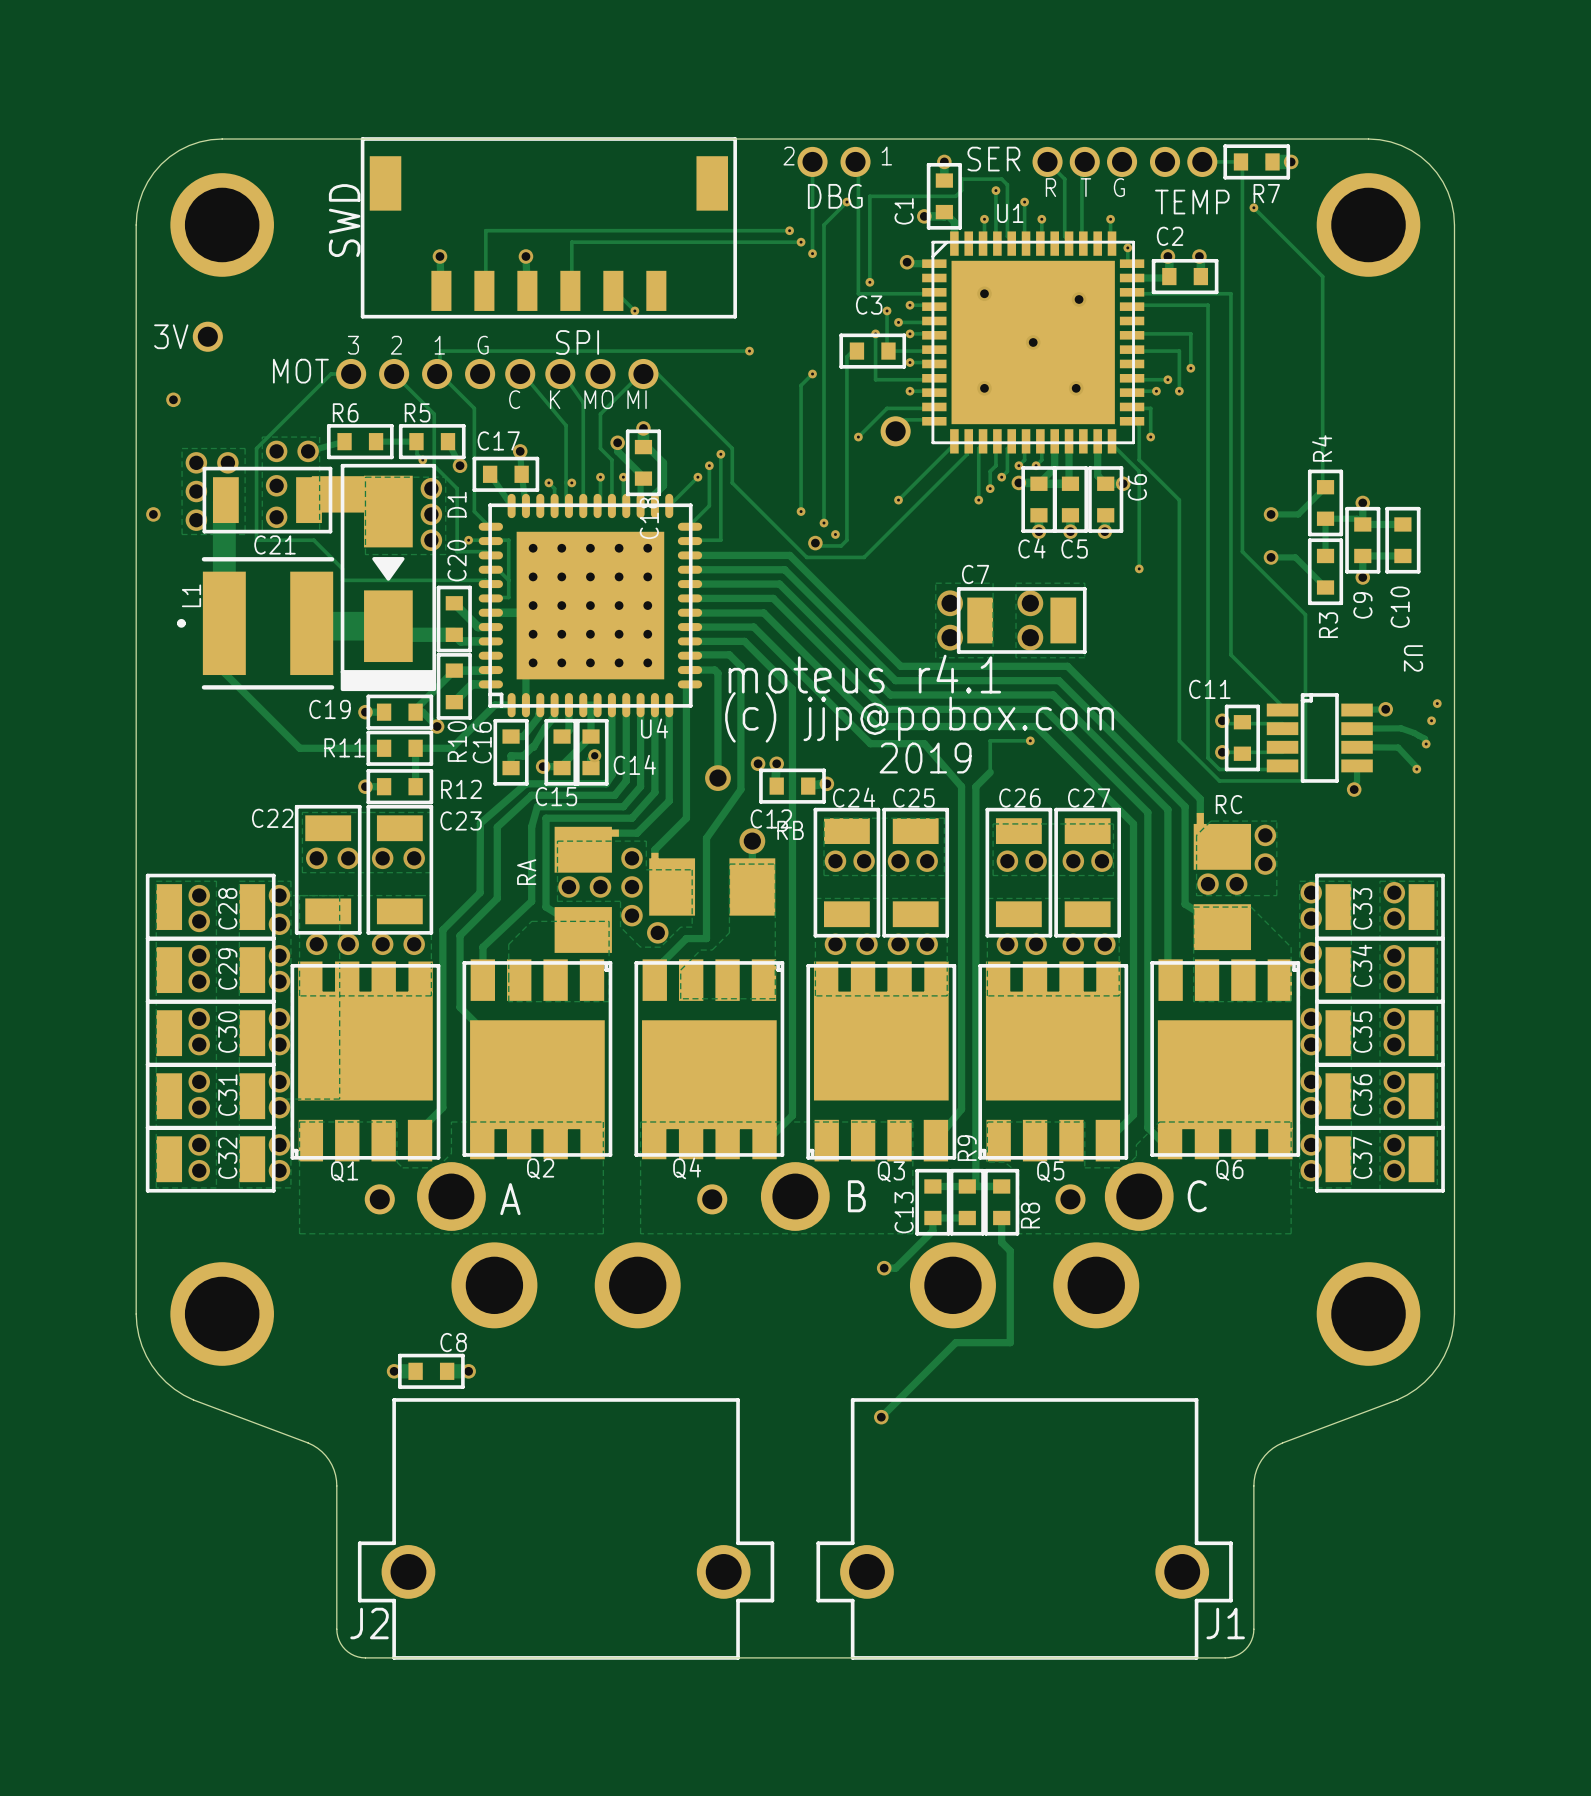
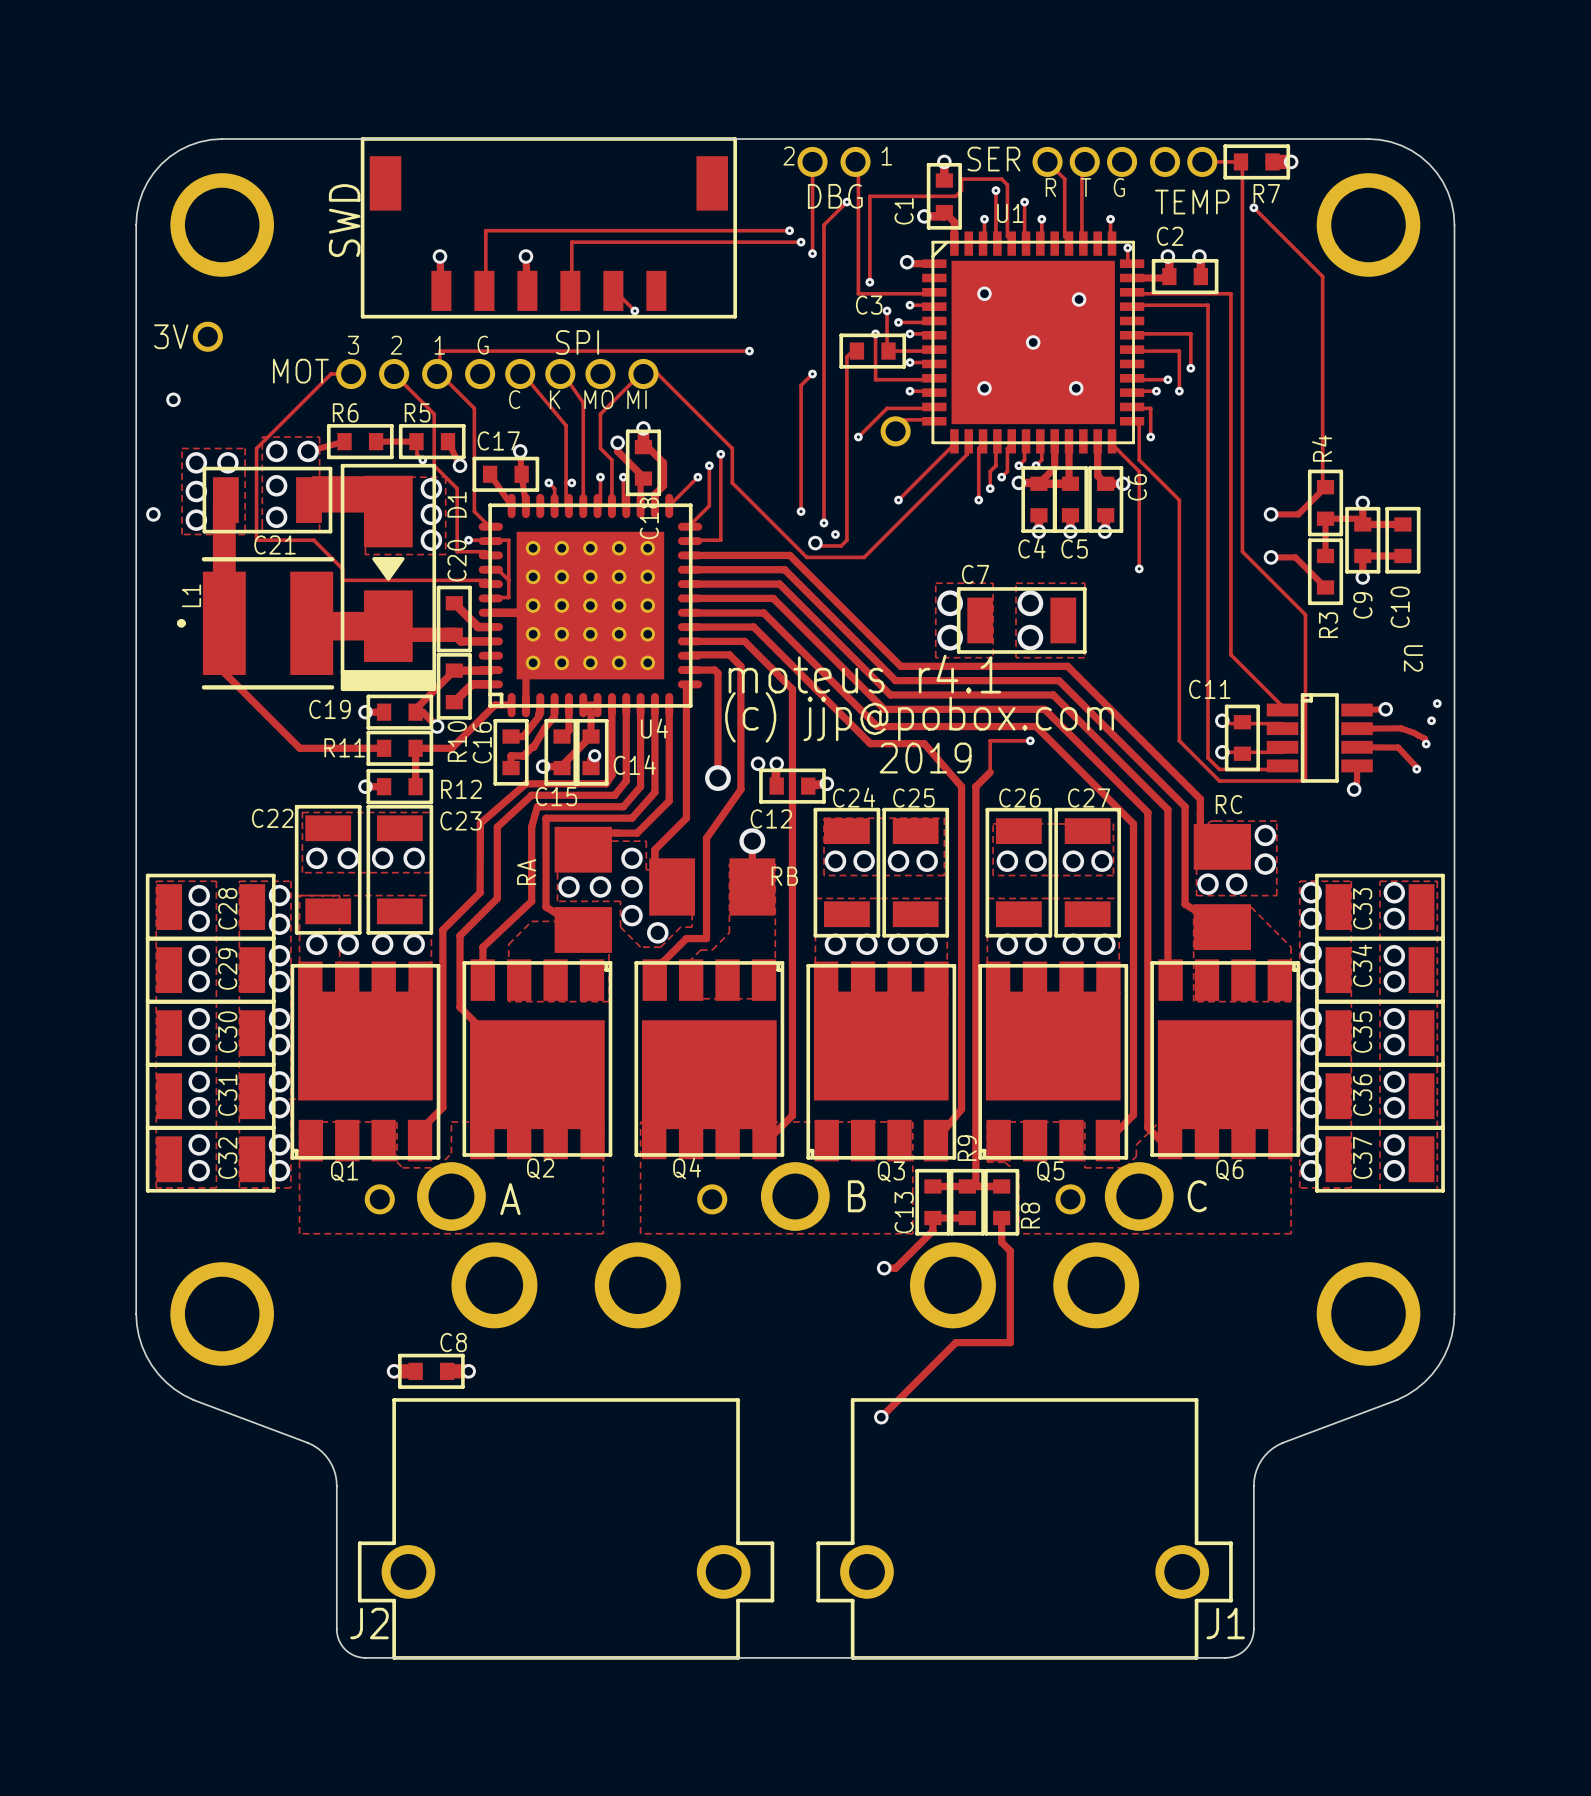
RB name position: RB (790, 830) -> RB (784, 876)

